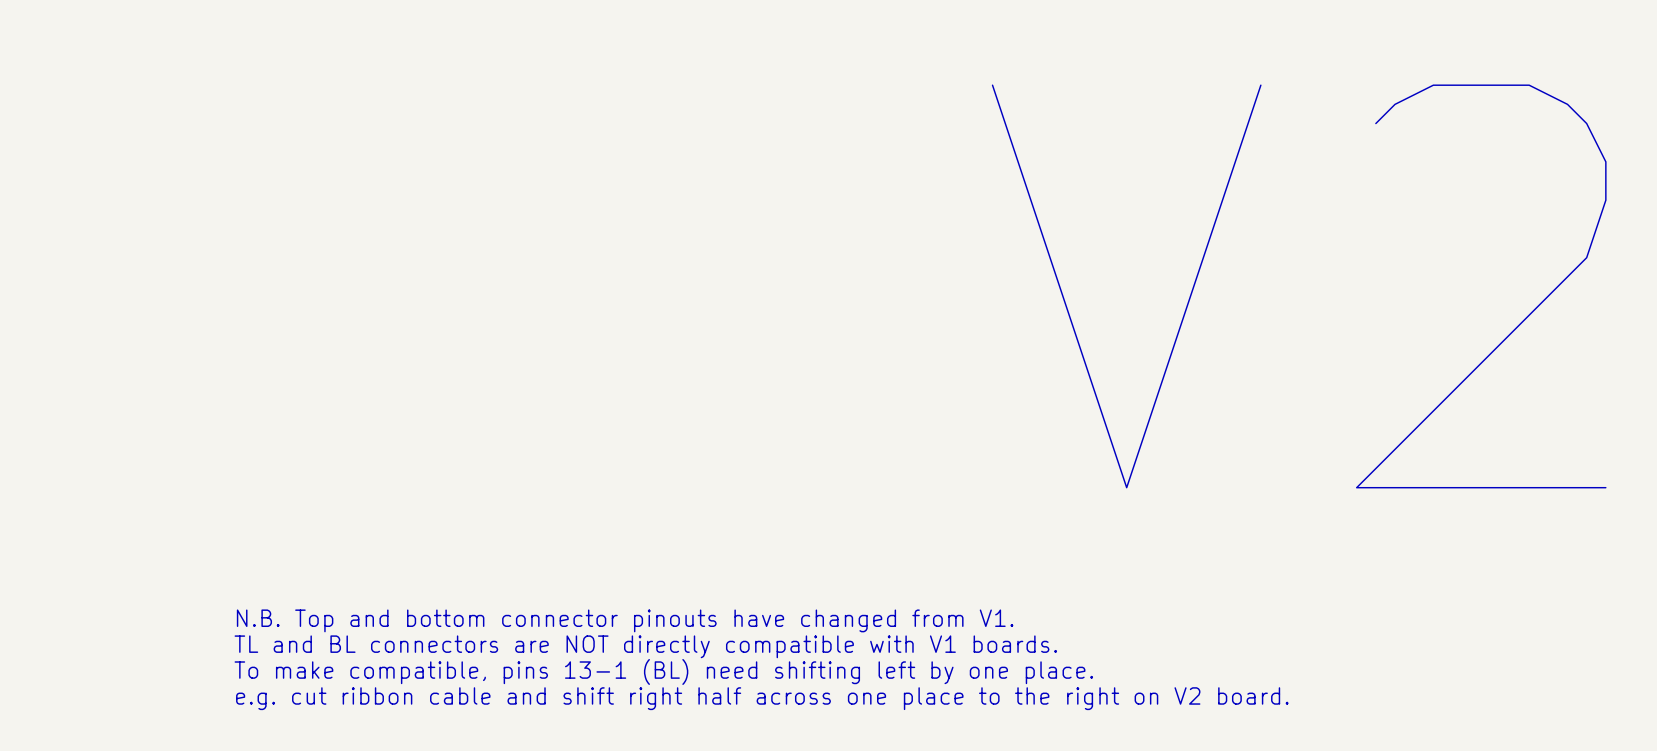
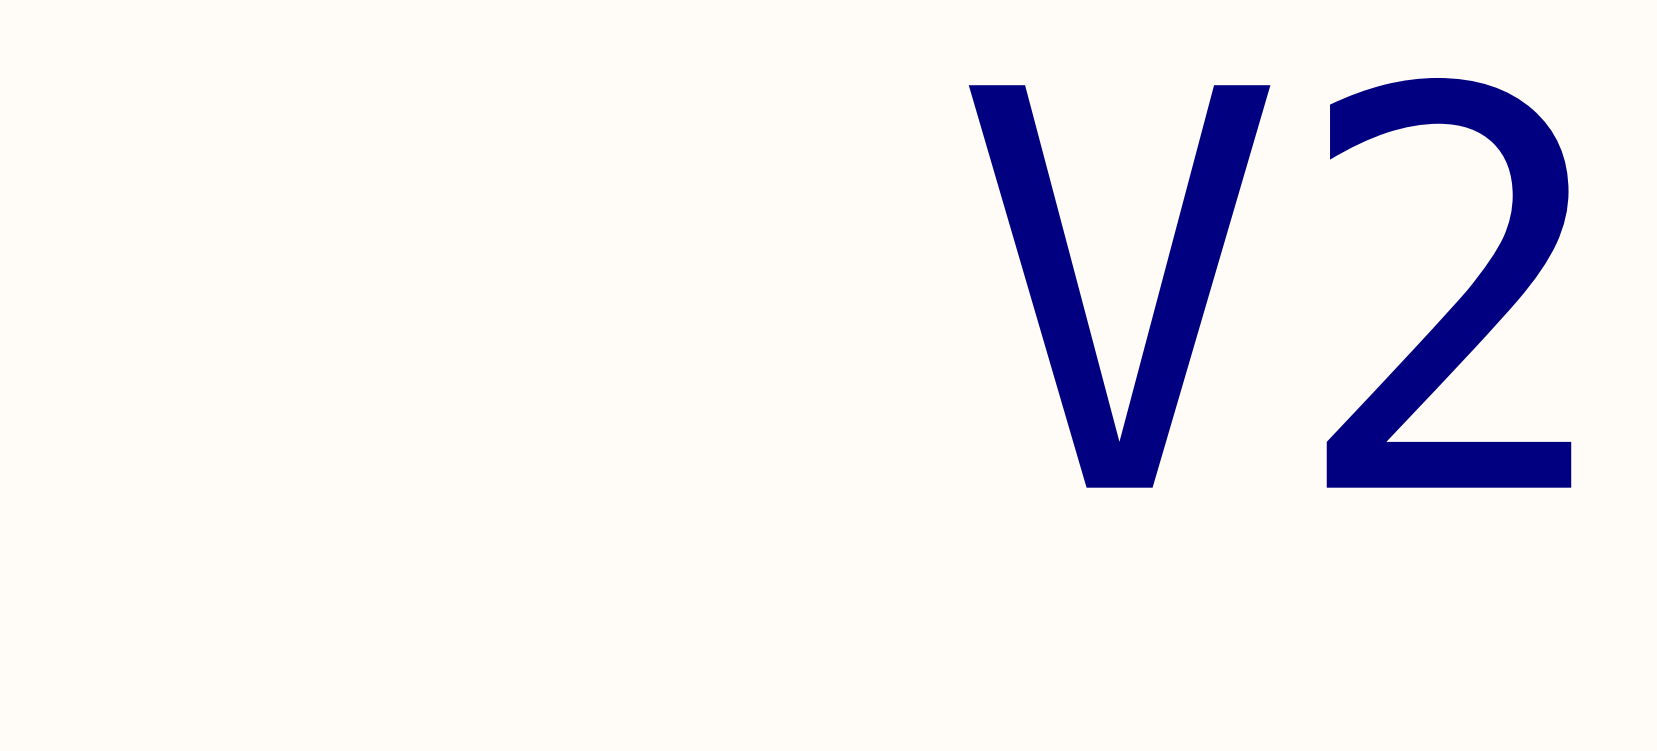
text: N.B. Top and bottom connector pinouts have changed from V1. (625, 620) -> none
text: TL and BL connectors are NOT directly compatible with V1 boards. (645, 646) -> none
text: To make compatible, pins 13-1 (BL) need shifting left by one place. (663, 671) -> none
text: e.g. cut ribbon cable and shift right half across one place to the right on V2 board. (762, 698) -> none

